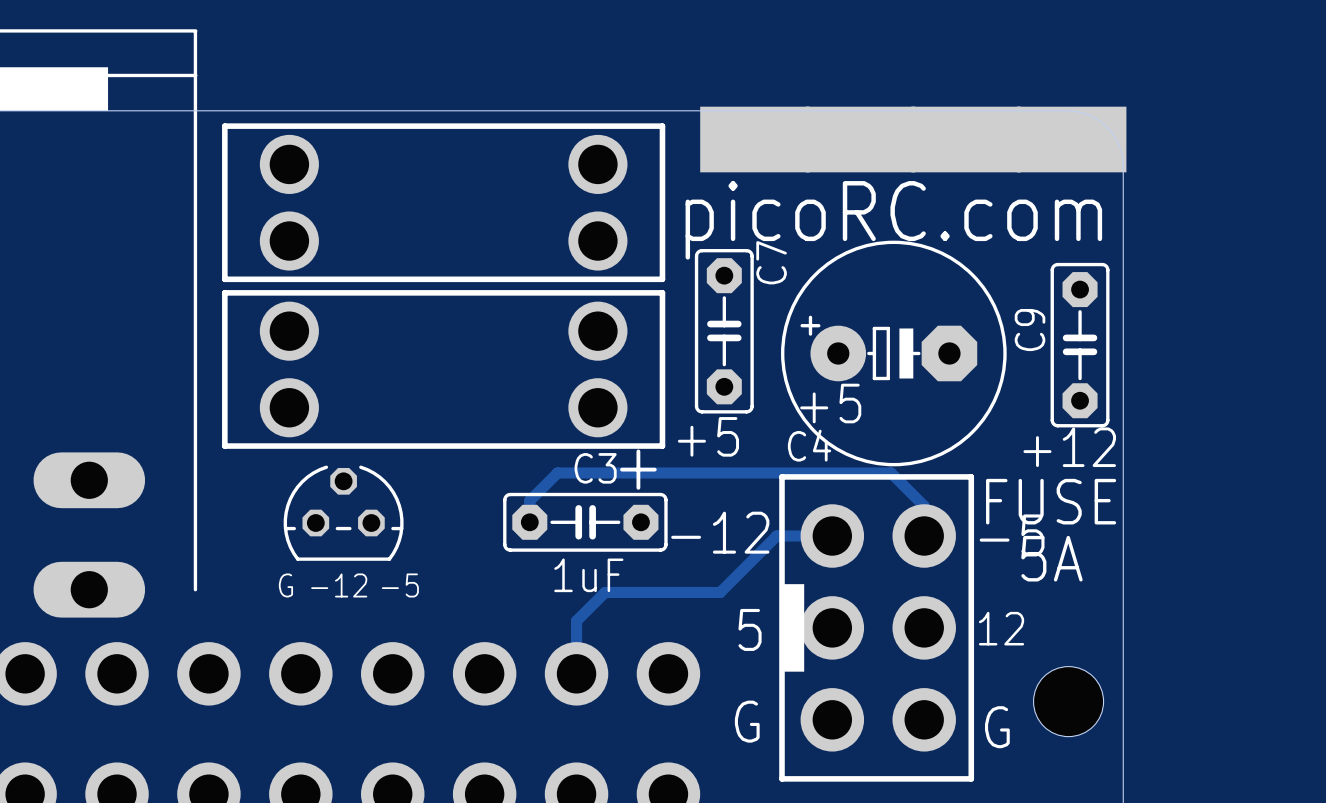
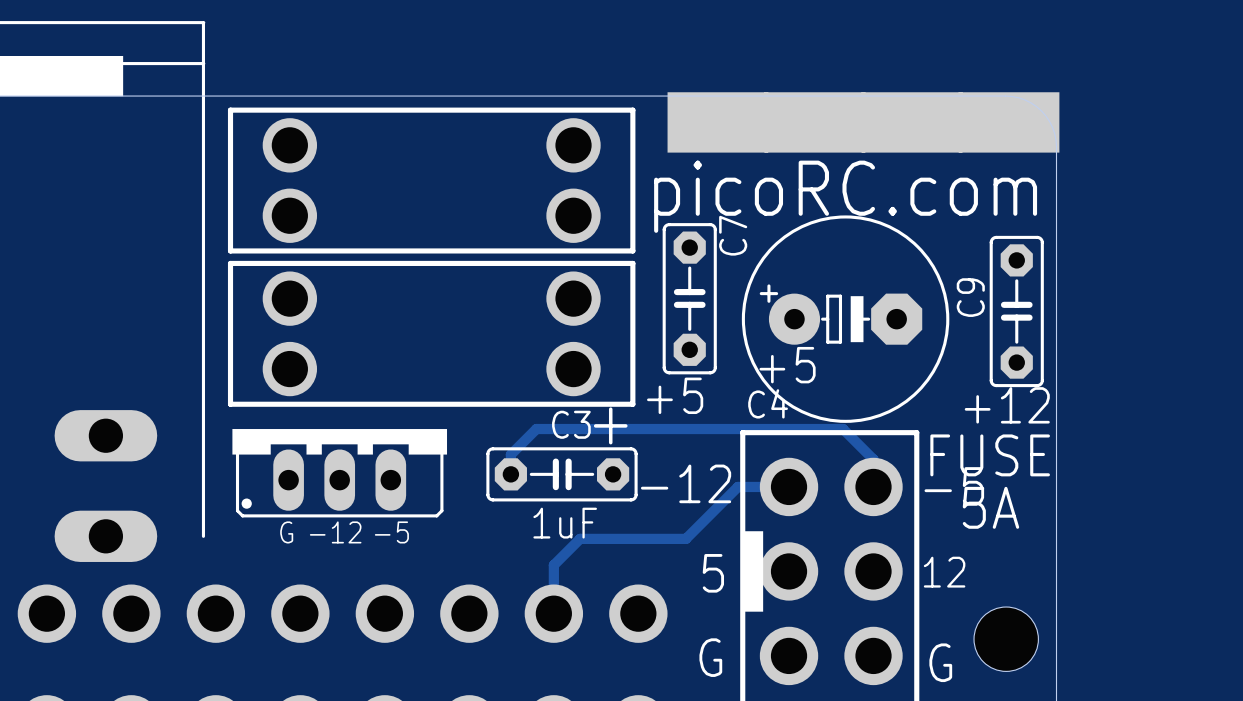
part footprint: [283, 465, 404, 561] -> [232, 429, 448, 518]

